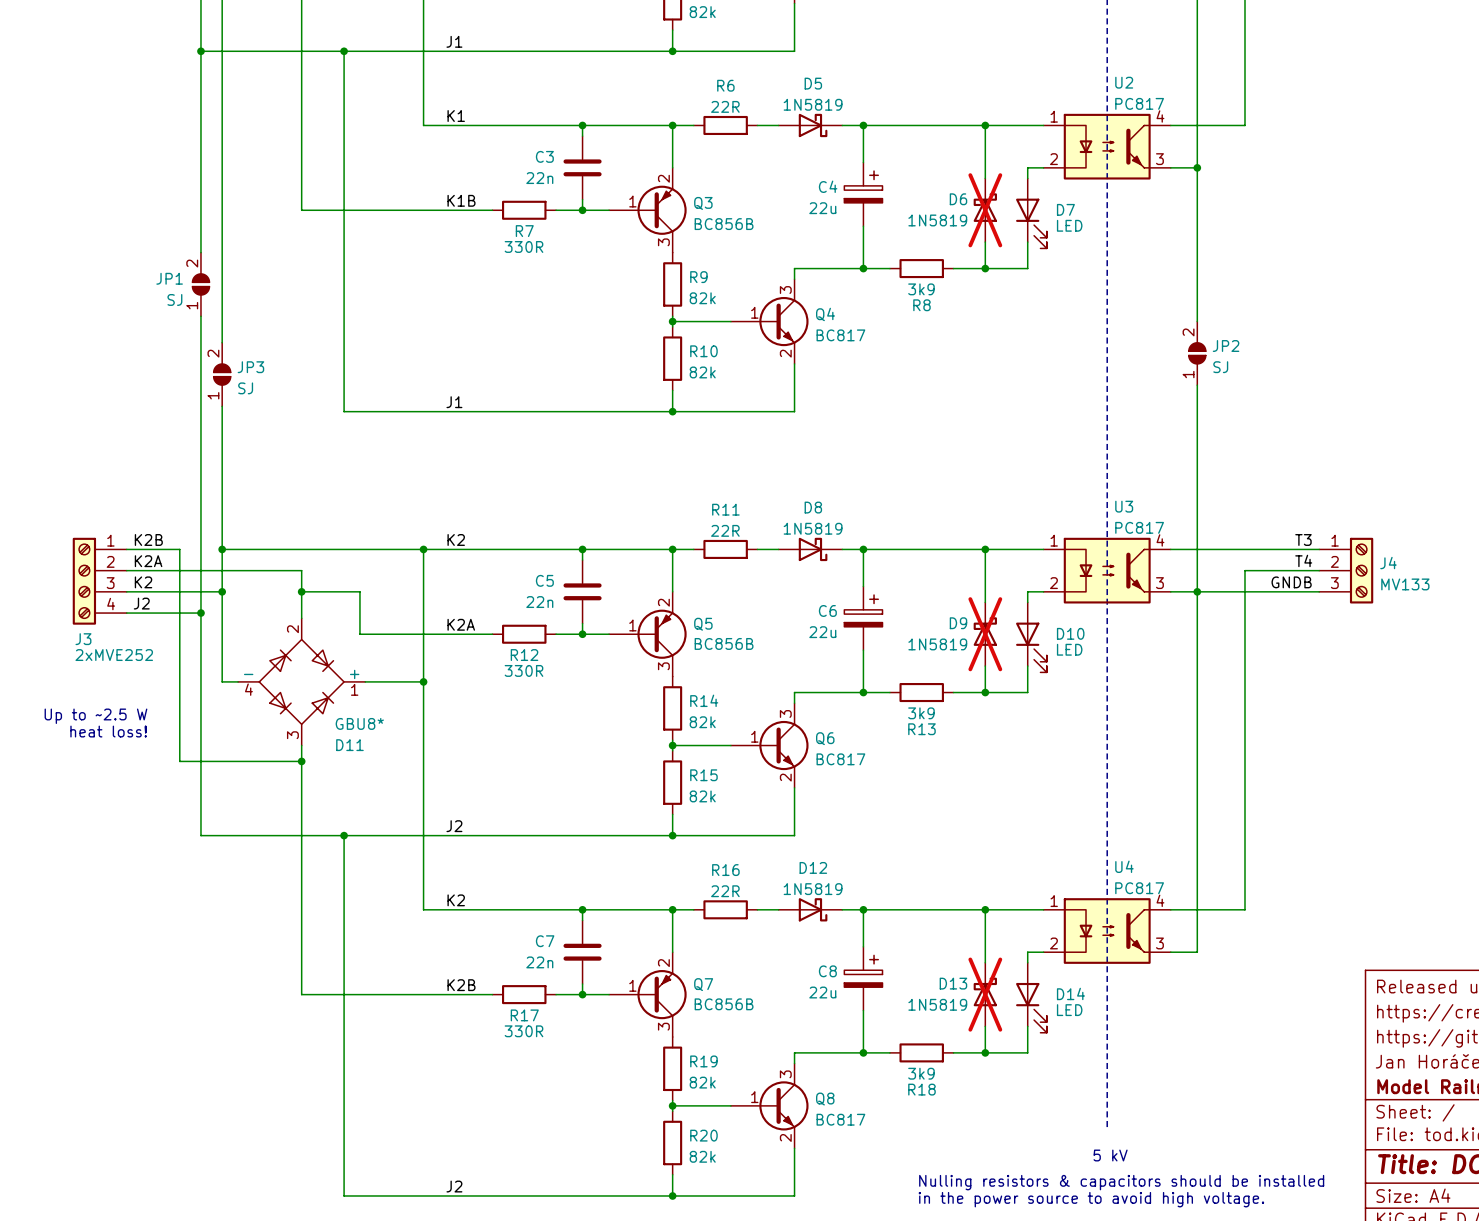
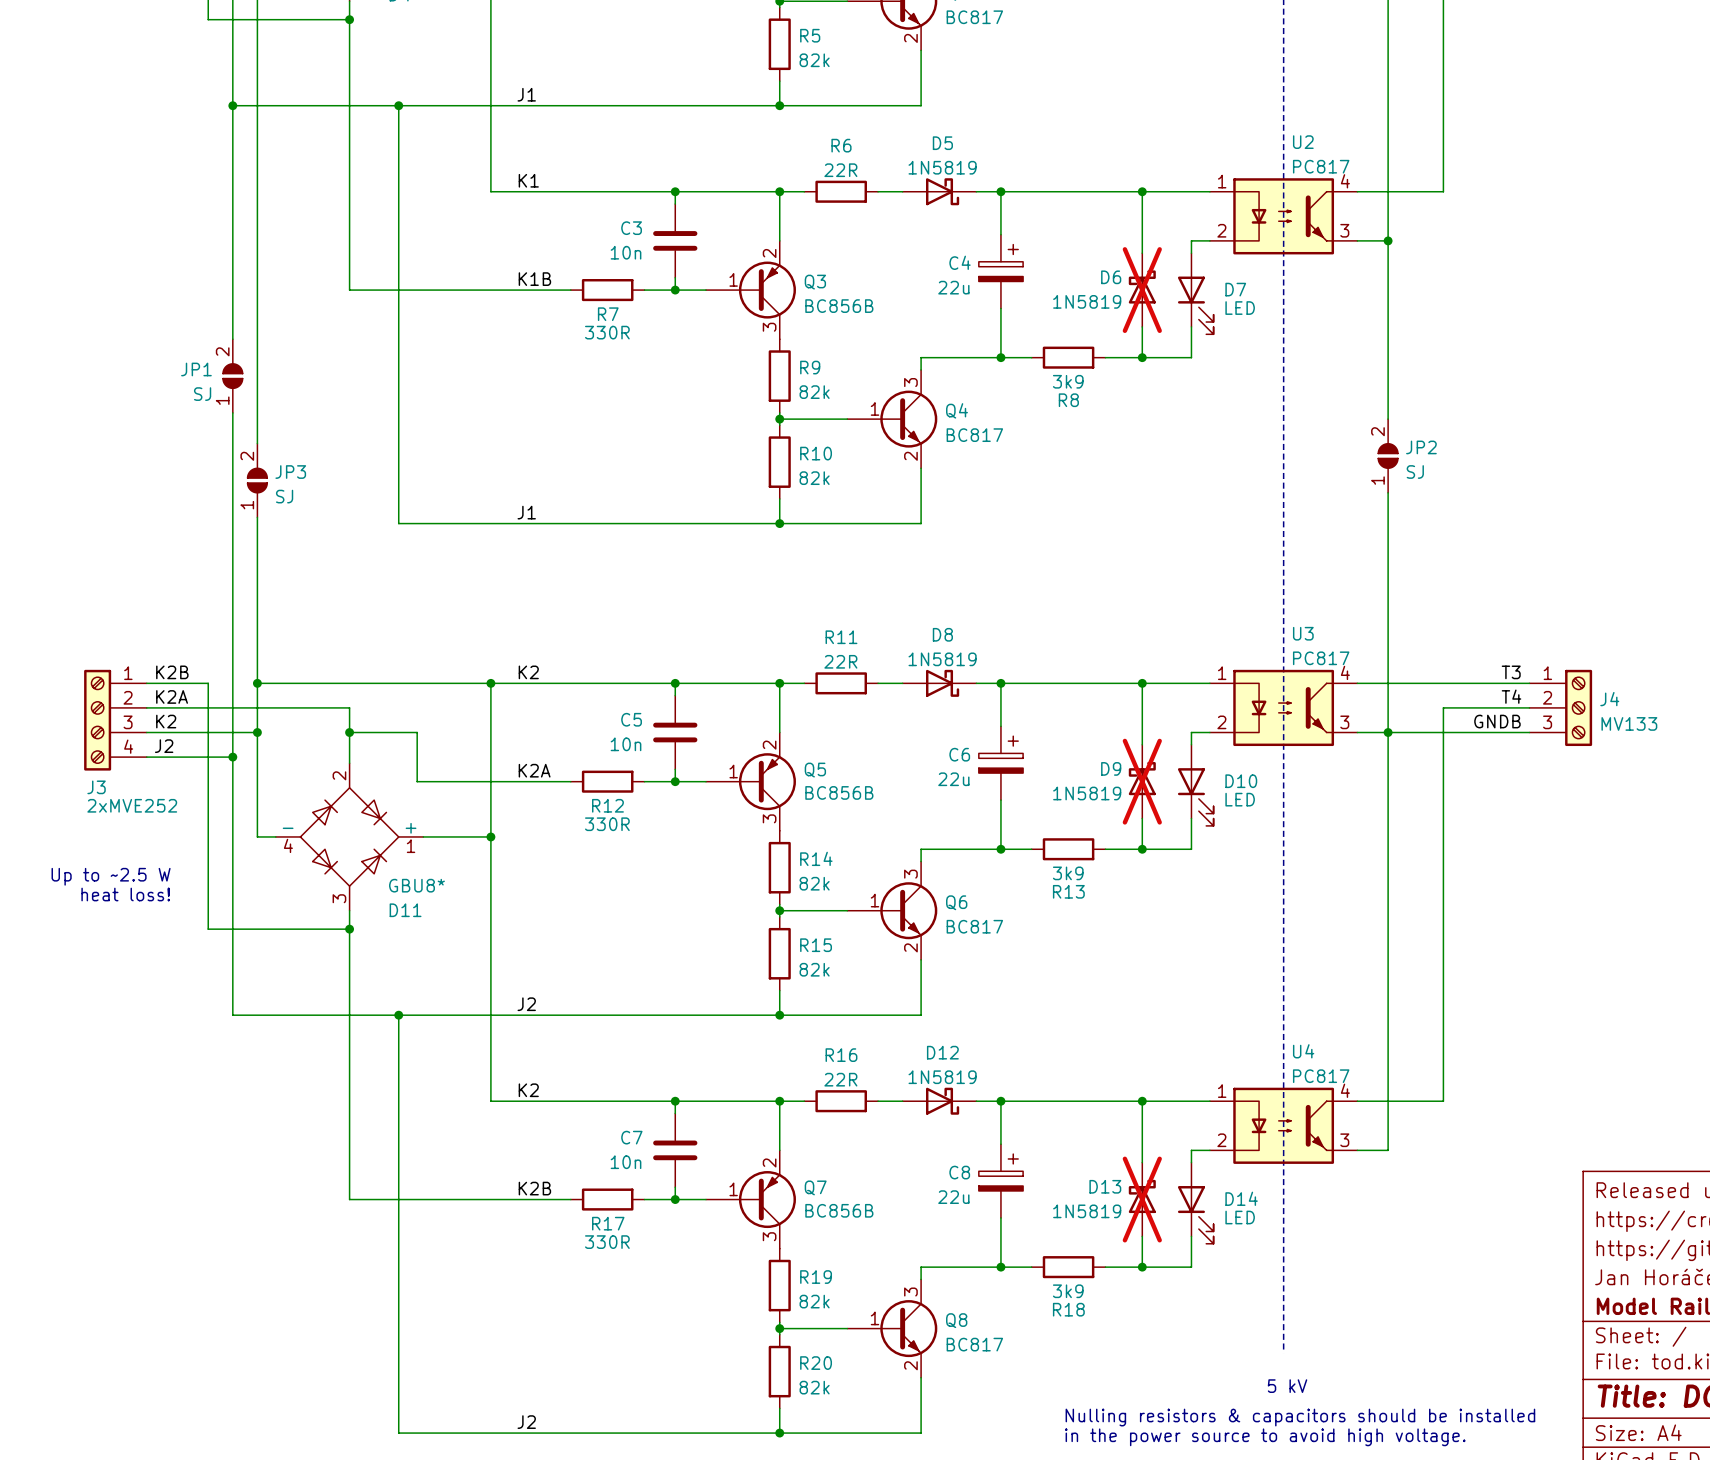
C3 value: 22n (539, 178) -> 10n (626, 252)
C5 value: 22n (539, 602) -> 10n (626, 744)
C7 value: 22n (539, 962) -> 10n (626, 1162)

